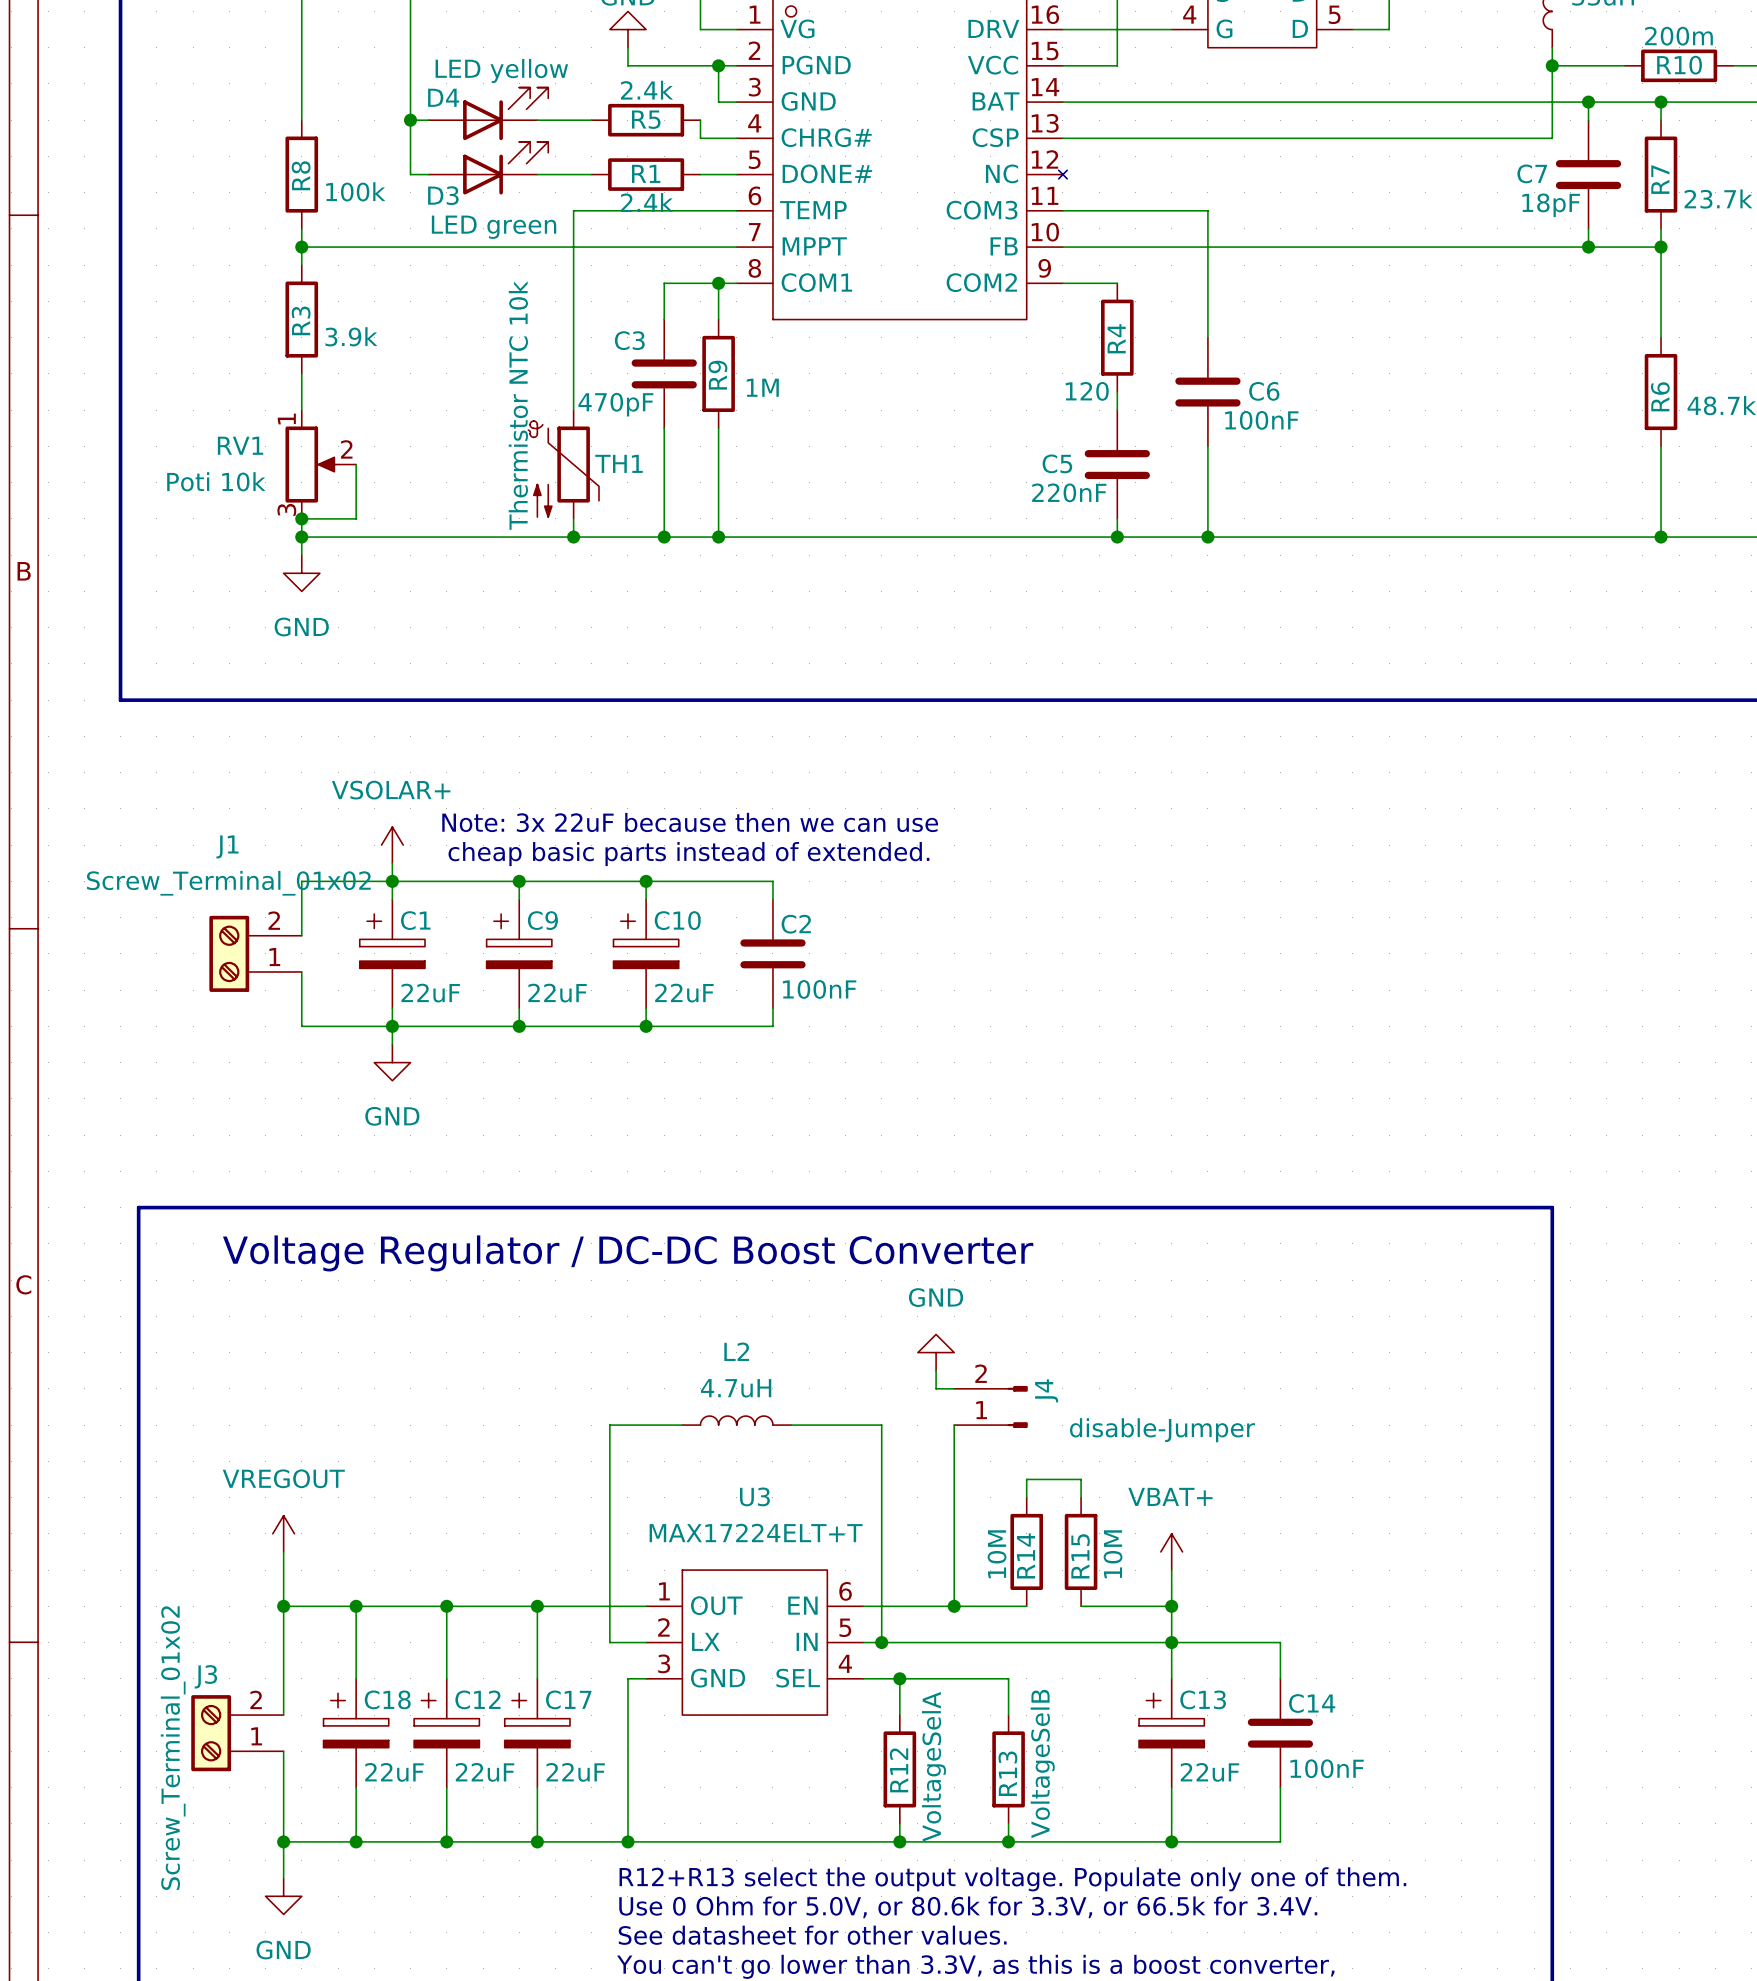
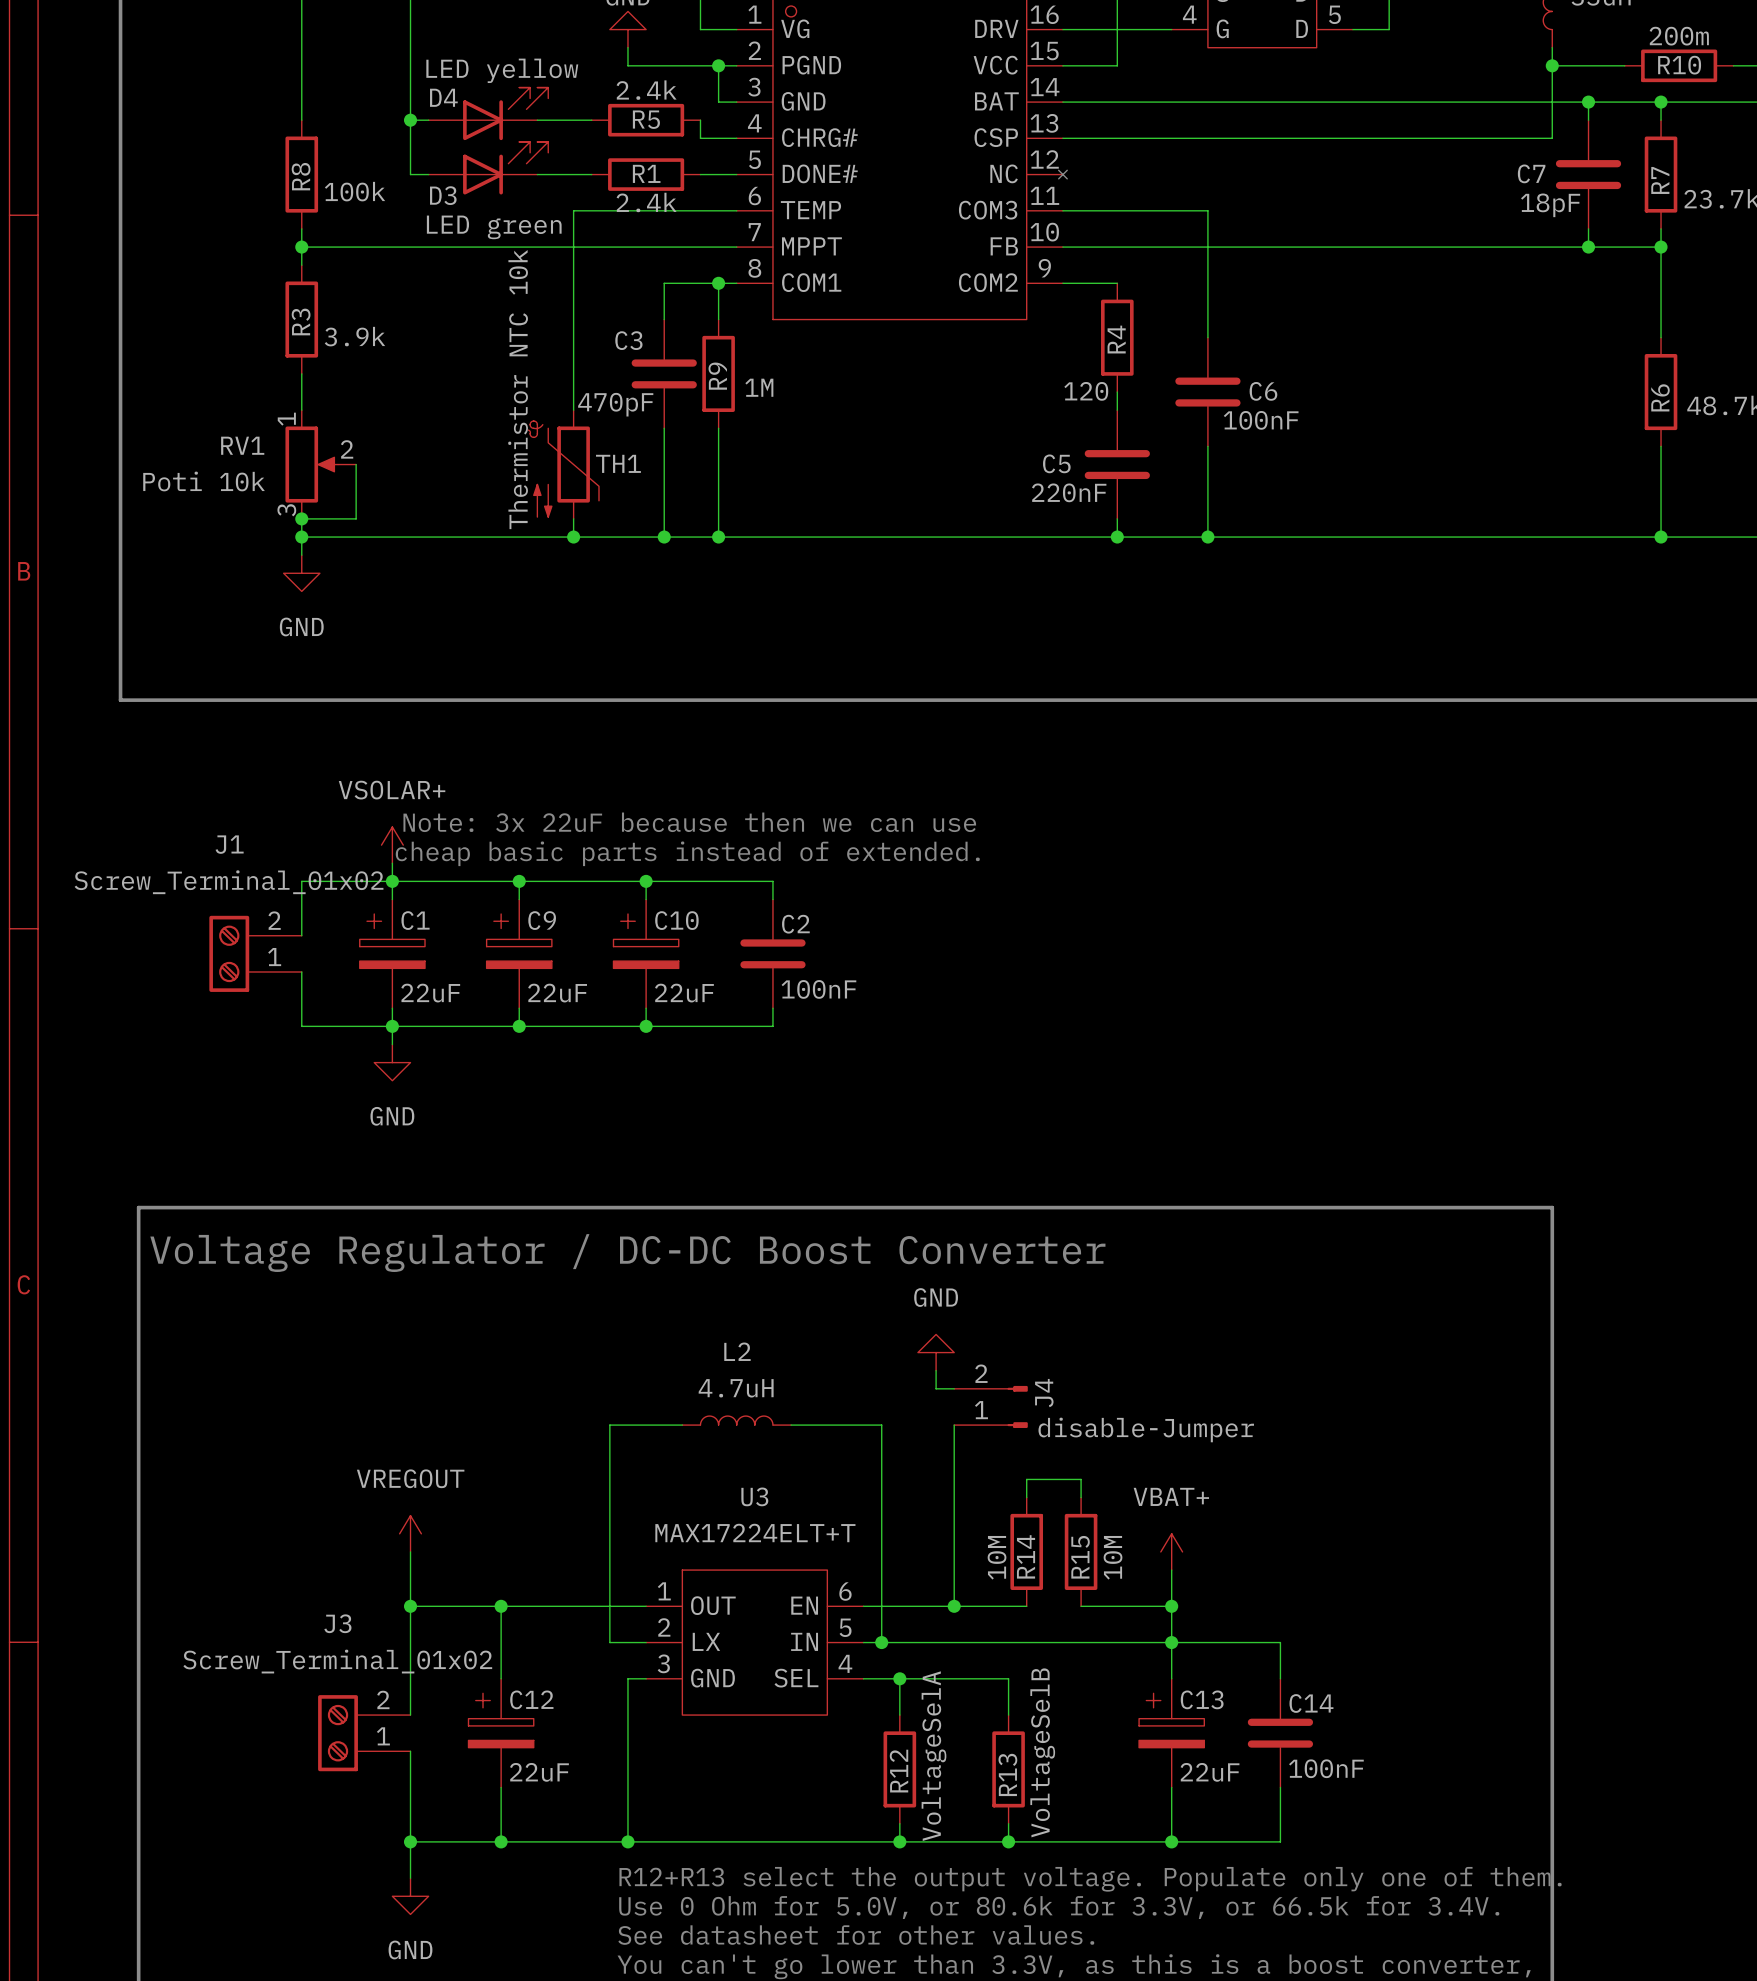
power symbol position: VREGOUT (283, 1533) -> VREGOUT (410, 1533)
wire: (283, 1551) (283, 1715) -> (410, 1551) (410, 1715)
wire: (283, 1606) (410, 1606) -> none
junction: (283, 1606) -> none
wire: (356, 1606) (356, 1678) -> none
junction: (356, 1606) -> none
junction: none -> (410, 1606)
wire: (446, 1606) (446, 1678) -> none
junction: (446, 1606) -> none
junction: none -> (501, 1606)
wire: (537, 1606) (537, 1678) -> (501, 1606) (501, 1678)
junction: (537, 1606) -> none
J3 name position: J3 (205, 1676) -> J3 (337, 1623)
J3 position: (237, 1733) -> (364, 1733)
C18: 22uF (356, 1733) -> none
C12 position: (446, 1733) -> (501, 1733)
C17: 22uF (537, 1733) -> none
J3 value rotation: 0° (173, 1748) -> 90° clockwise (337, 1661)
wire: (283, 1751) (283, 1878) -> (410, 1751) (410, 1878)
wire: (356, 1787) (356, 1841) -> none
wire: (446, 1787) (446, 1841) -> none
wire: (537, 1787) (537, 1841) -> (501, 1787) (501, 1841)
wire: (283, 1841) (410, 1841) -> none
junction: (283, 1841) -> none
junction: (356, 1841) -> none
junction: none -> (410, 1841)
junction: (446, 1841) -> none
junction: none -> (501, 1841)
junction: (537, 1841) -> none
power symbol position: GND (283, 1896) -> GND (410, 1896)

